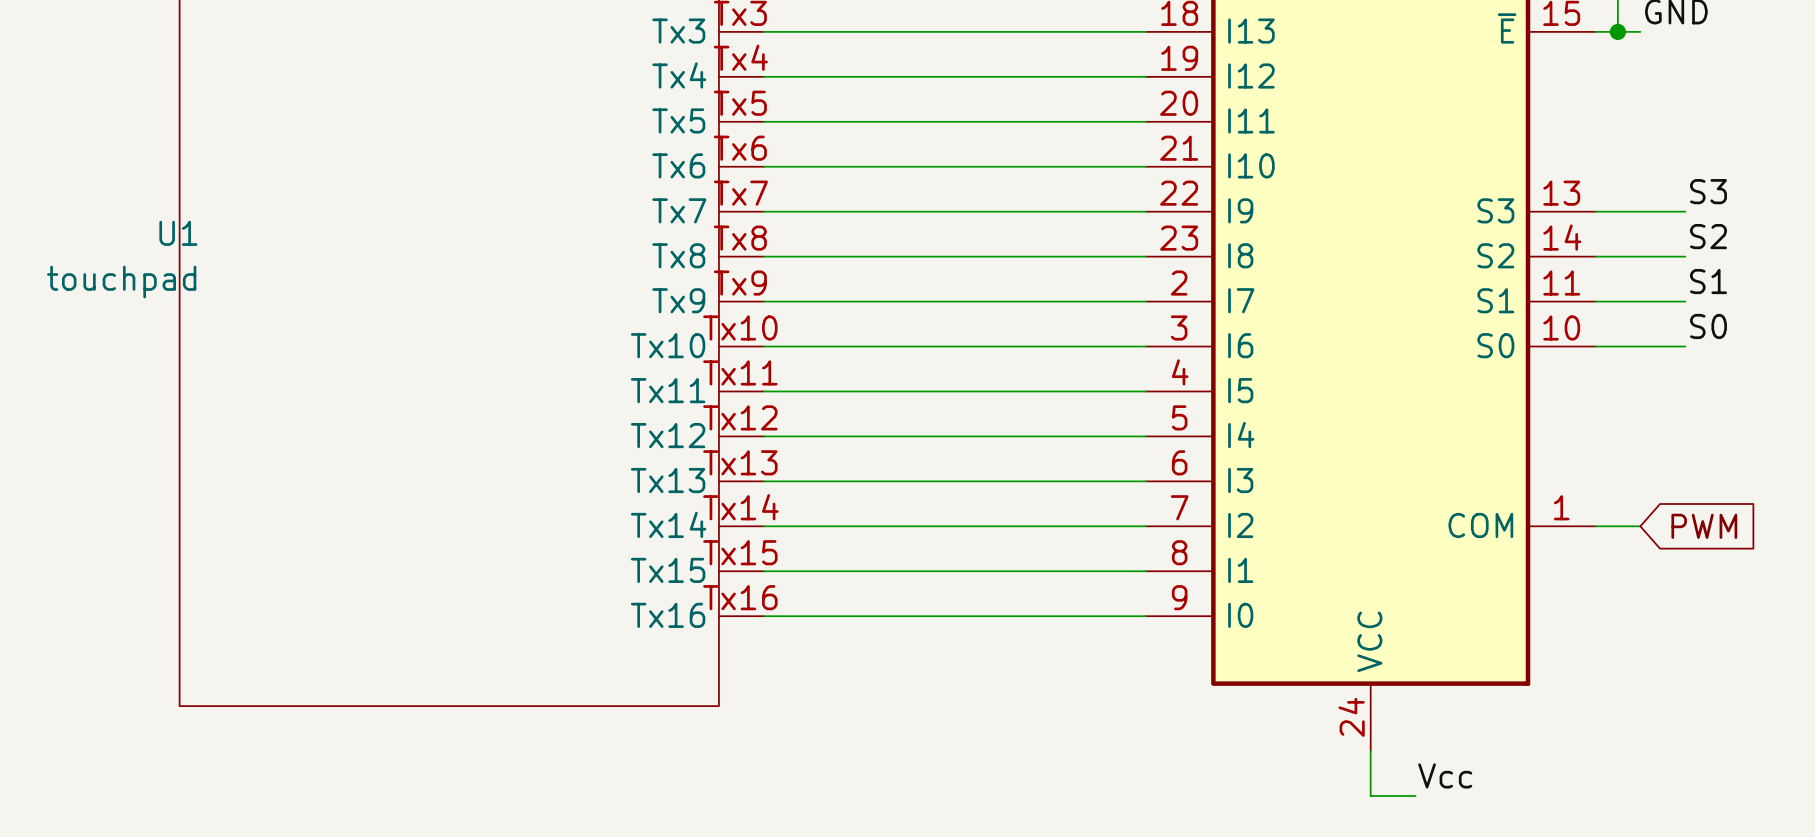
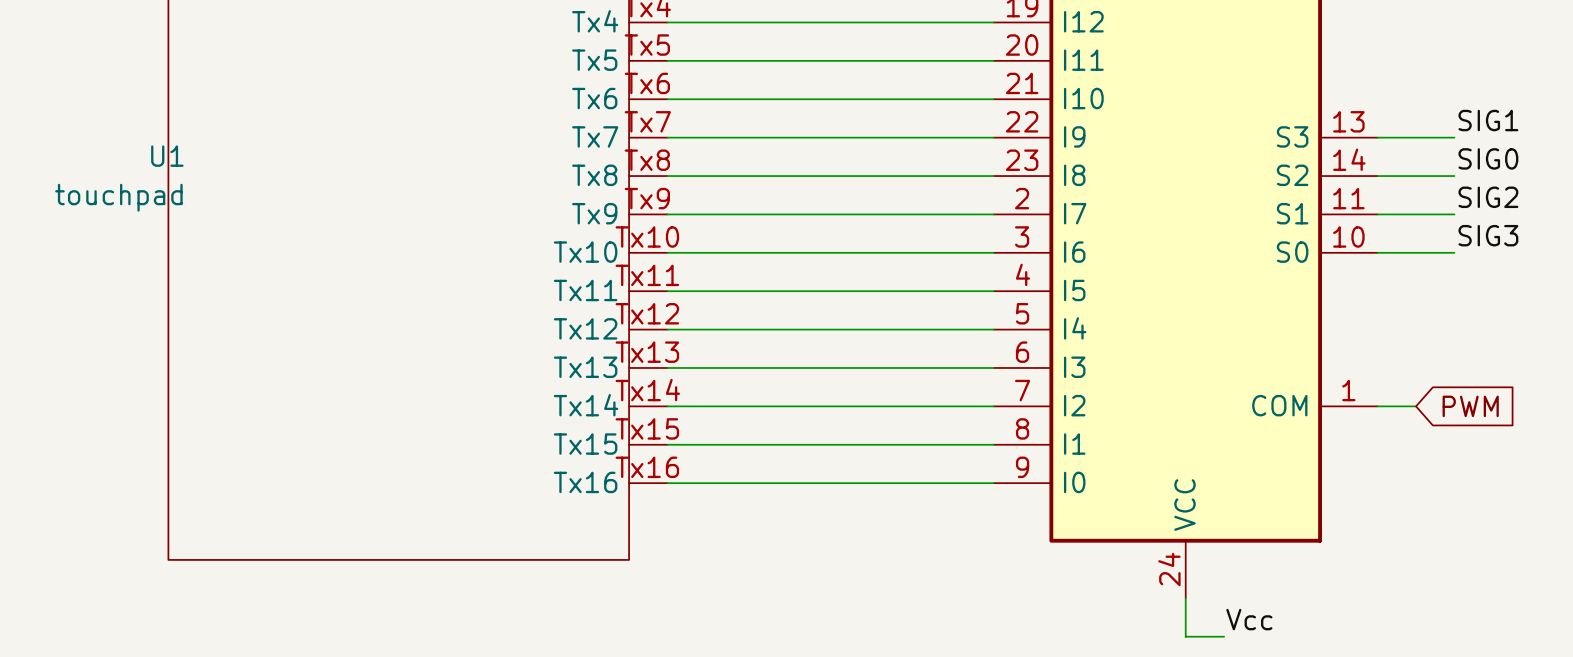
label: S3 (1708, 191) -> SIG1 (1488, 120)
label: S2 (1708, 236) -> SIG0 (1488, 158)
label: S1 (1708, 281) -> SIG2 (1488, 197)
label: S0 (1708, 326) -> SIG3 (1488, 235)

